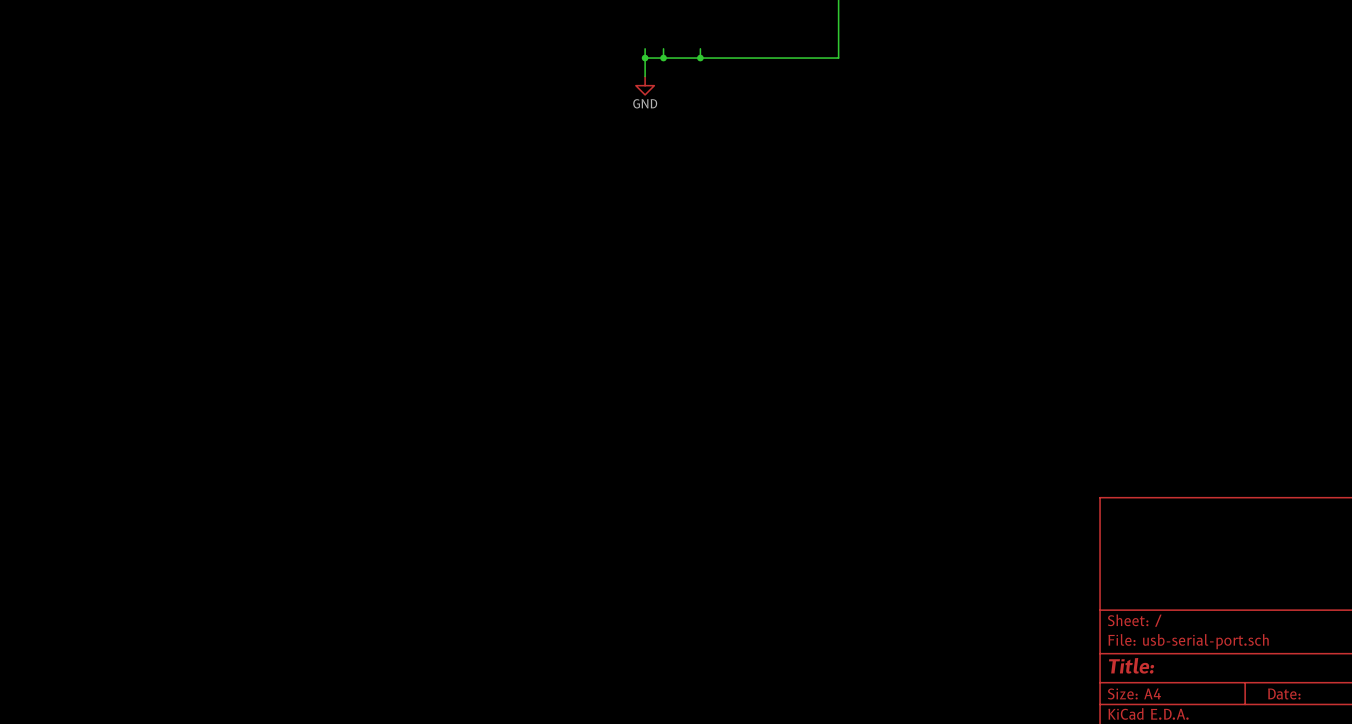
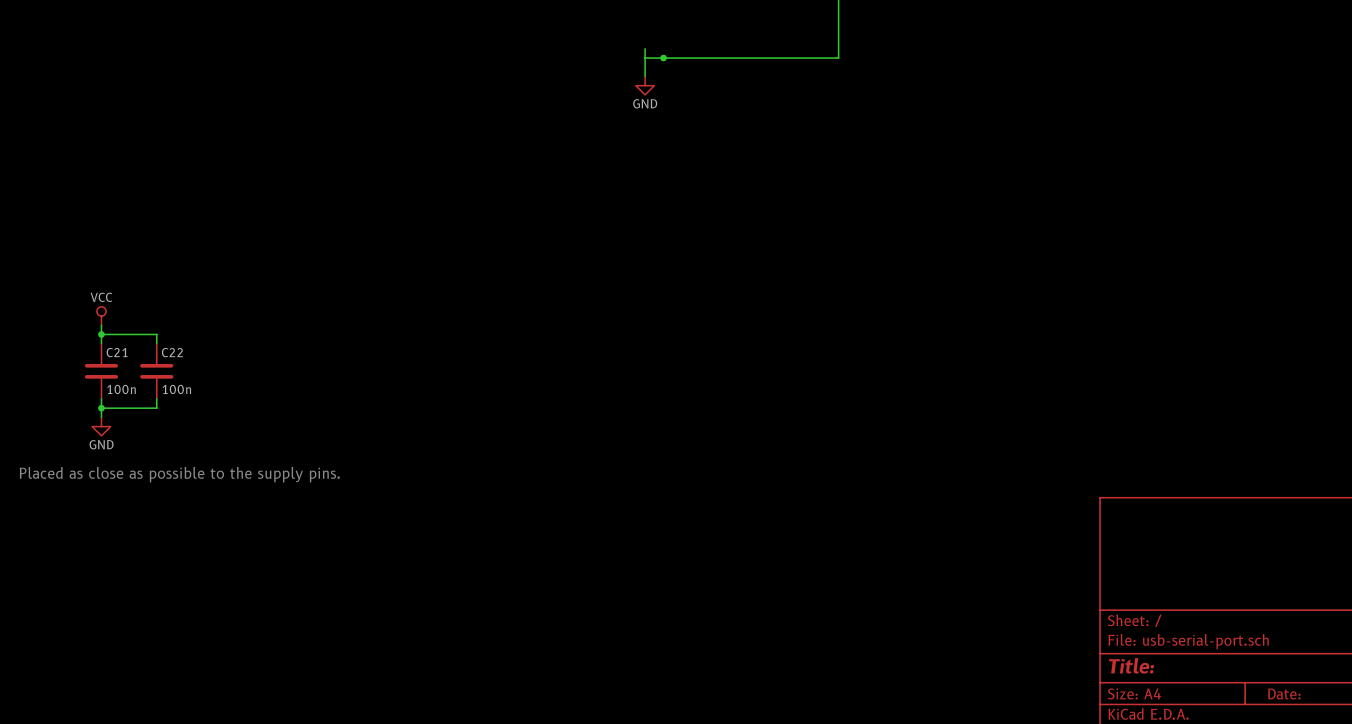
wire: (663, 48) (663, 58) -> none
wire: (700, 48) (700, 58) -> none
junction: (645, 58) -> none
junction: (700, 58) -> none
power symbol: none -> VCC (101, 316)
wire: none -> (101, 325) (101, 343)
wire: none -> (101, 334) (156, 334) (156, 343)
junction: none -> (101, 334)
C21: none -> 100n (101, 371)
C22: none -> 100n (156, 371)
wire: none -> (101, 398) (101, 417)
wire: none -> (156, 398) (156, 408) (101, 408)
junction: none -> (101, 408)
power symbol: none -> GND (101, 426)
text: none -> Placed as close as possible to the supply pins. (179, 474)

